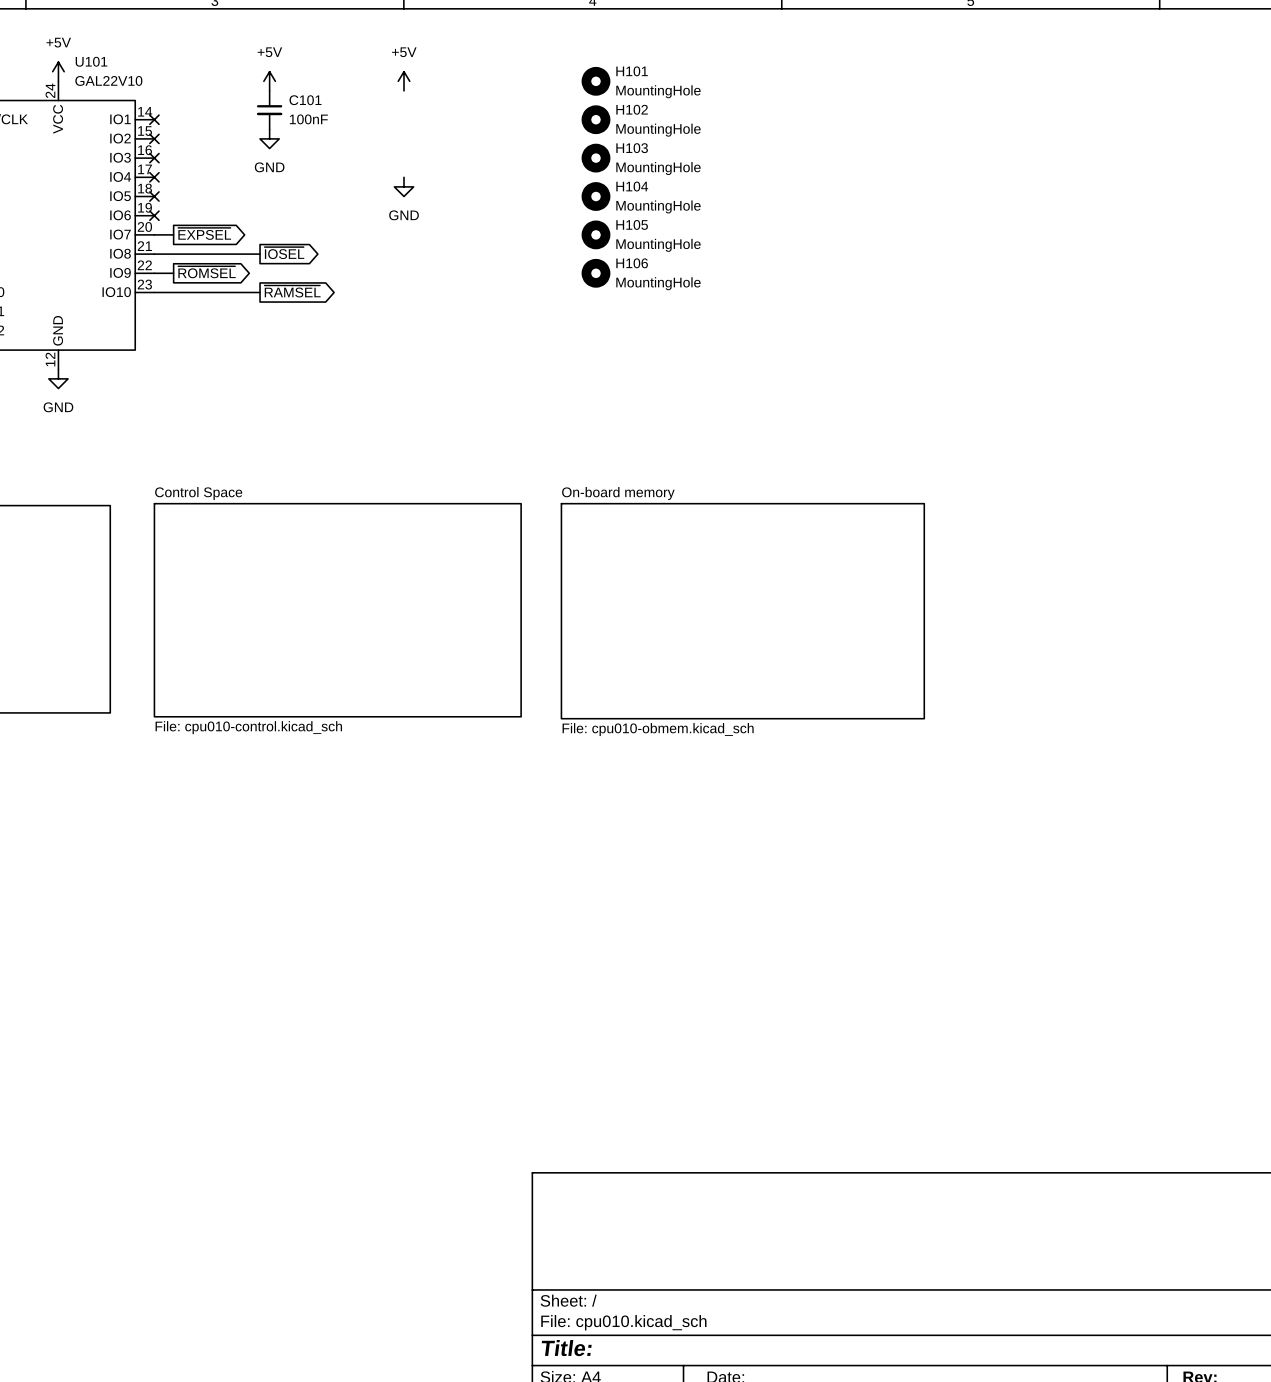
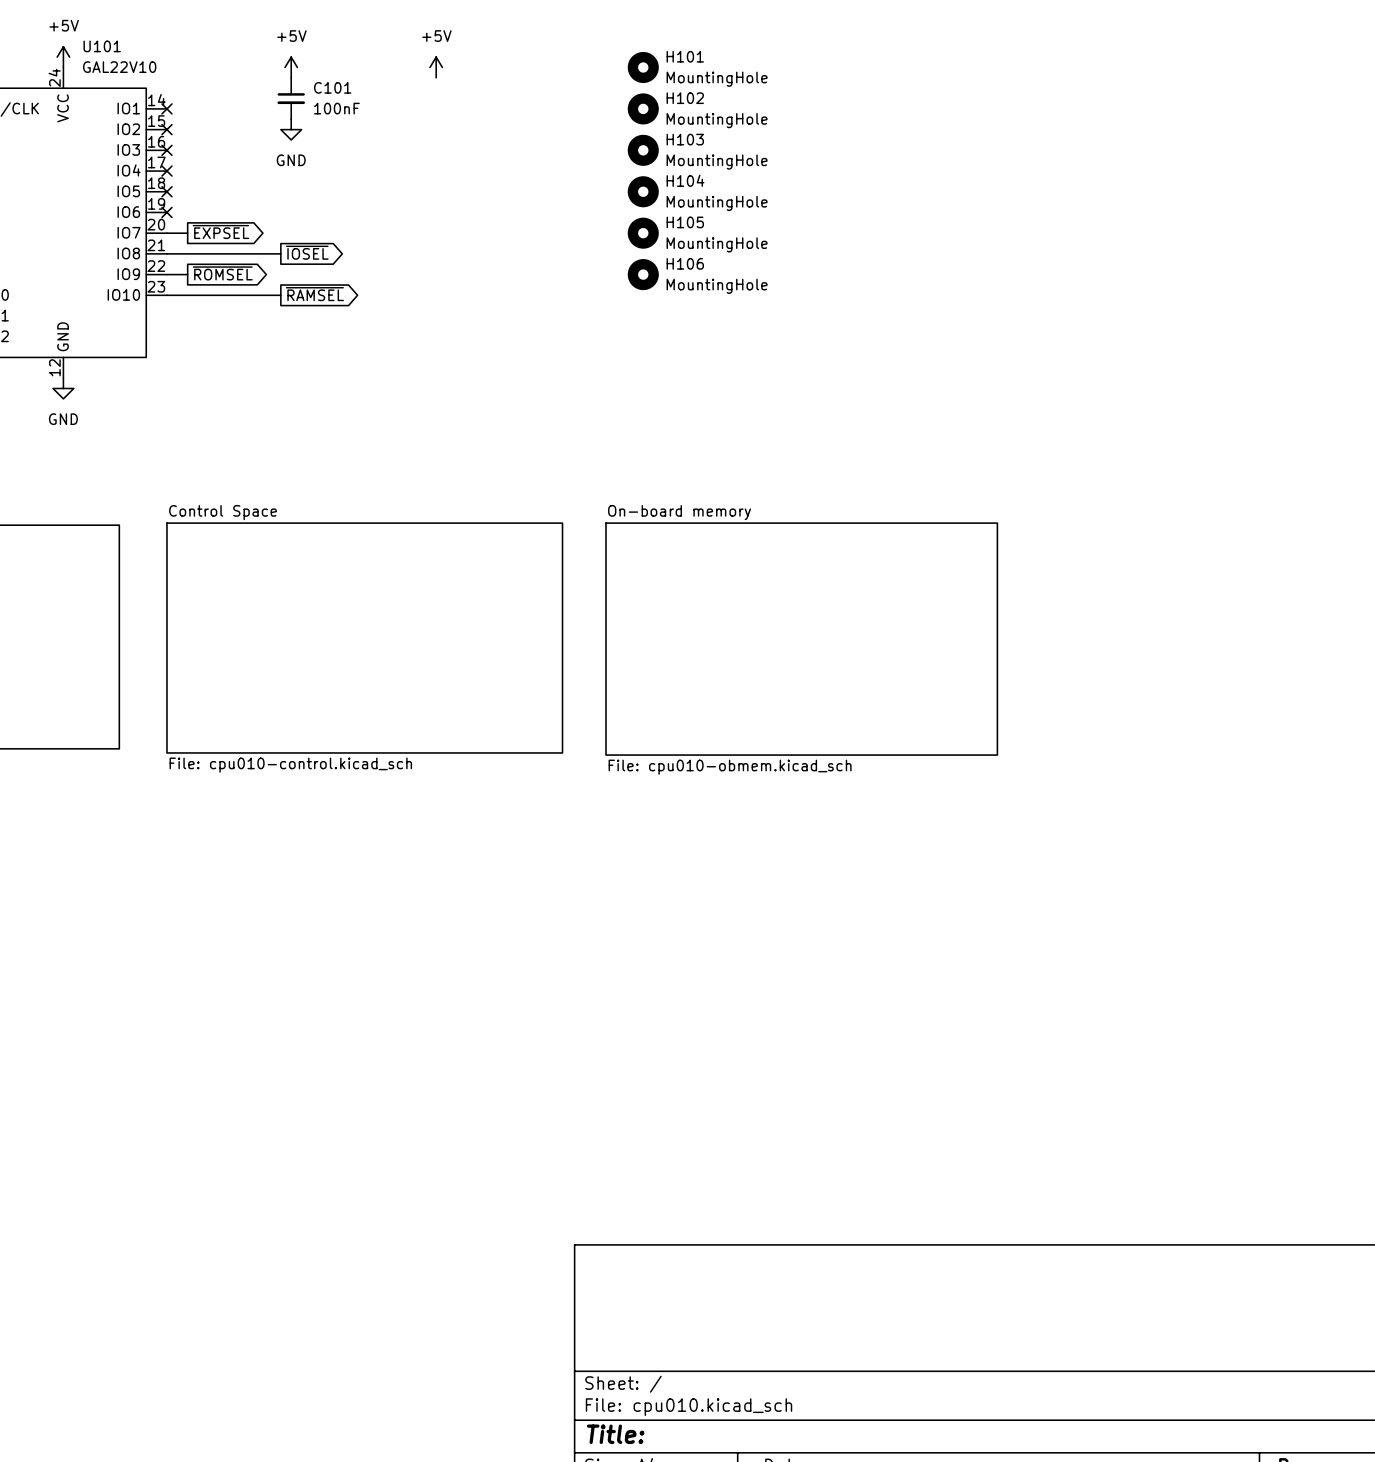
power symbol: GND (404, 186) -> none

